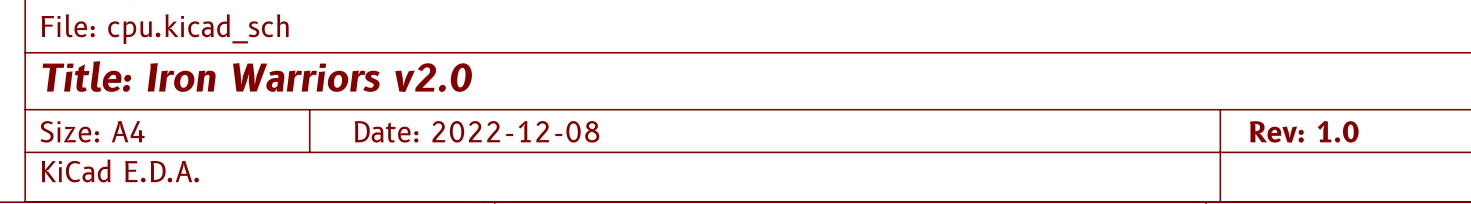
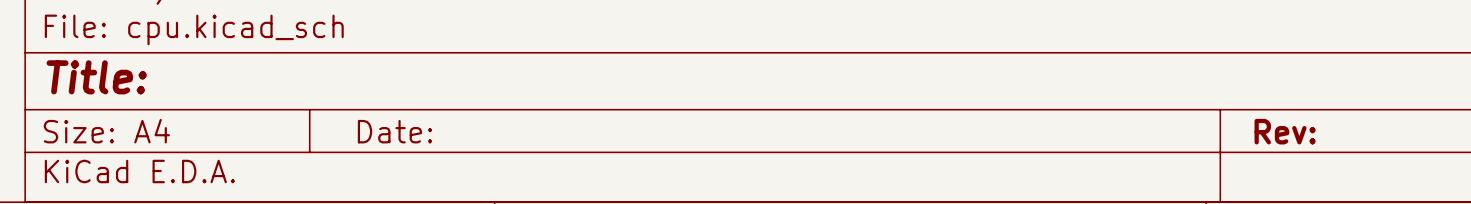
title block: Title: Iron Warriors v2.0 (257, 76) -> Title: (96, 77)
title block: Date: 2022-12-08 (477, 131) -> Date: (394, 131)
title block: Rev: 1.0 (1304, 131) -> Rev: (1285, 131)

